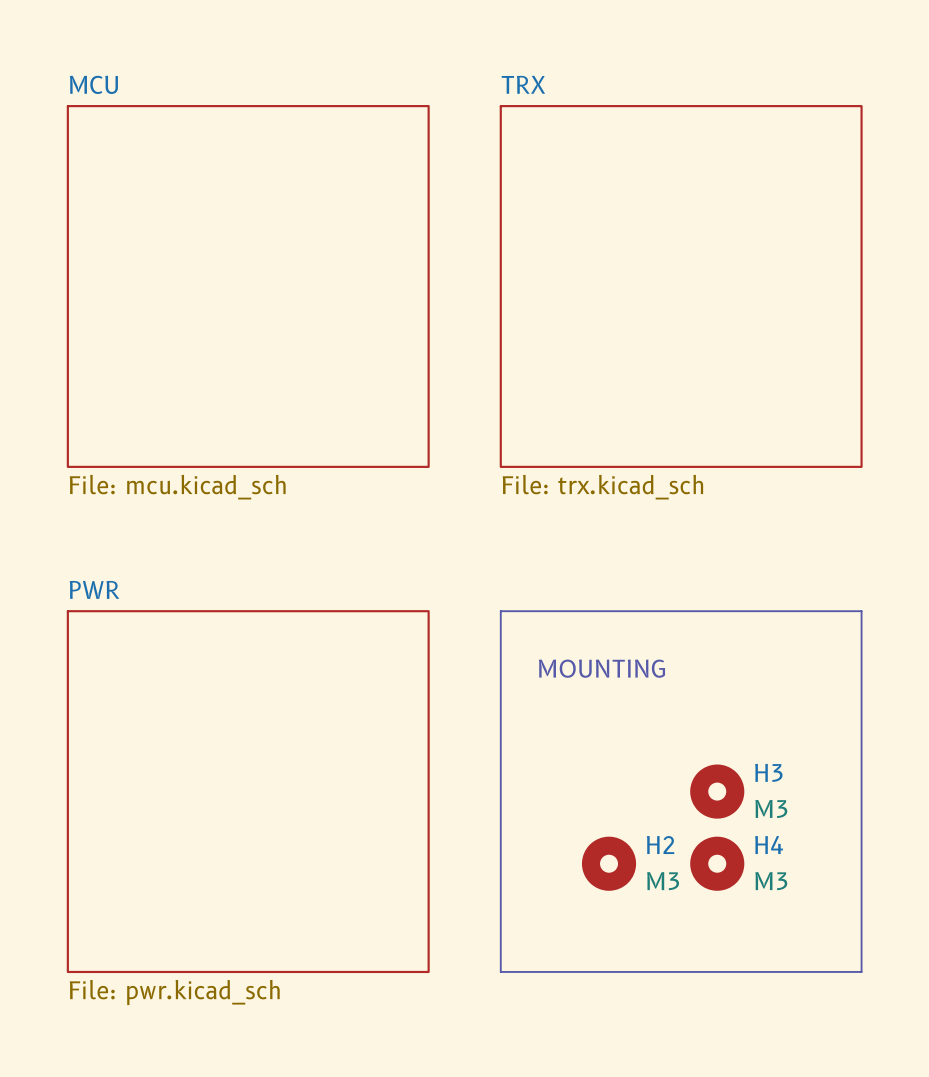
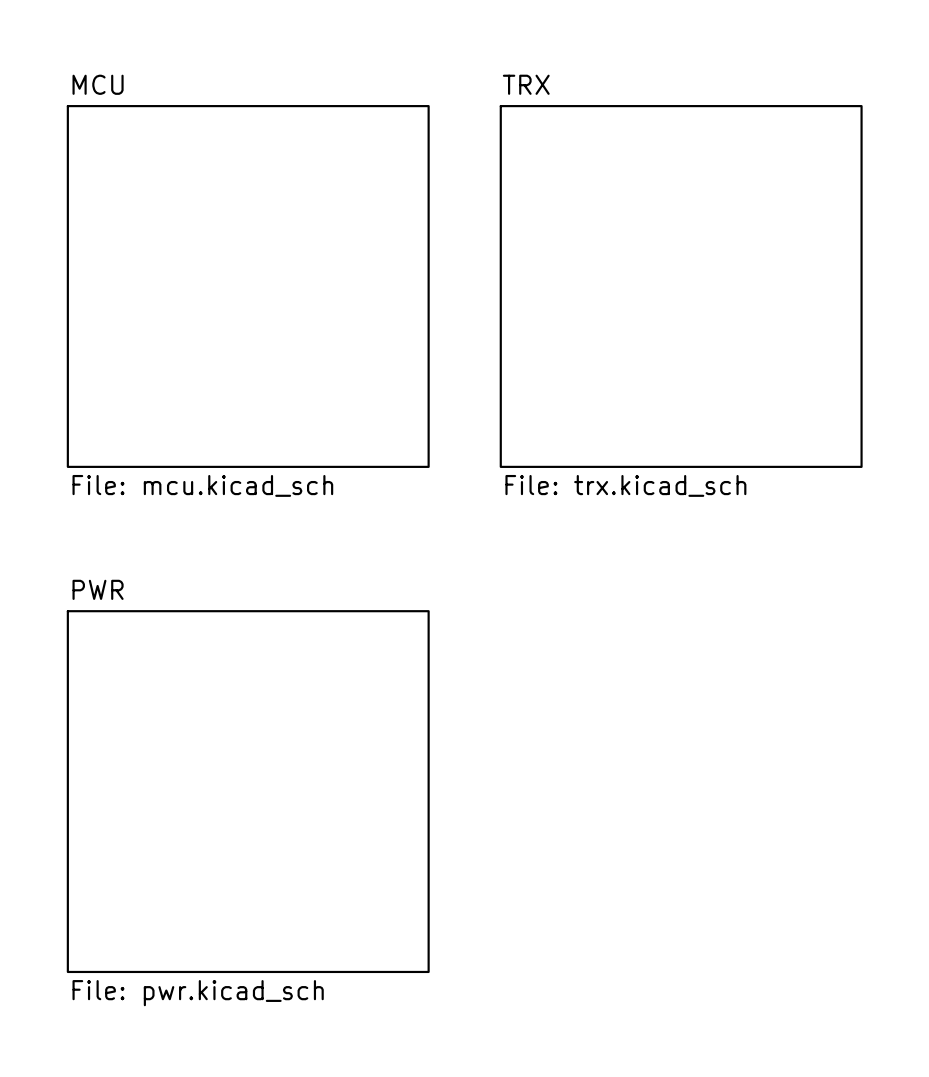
line: (500, 611) (500, 971) (861, 971) (861, 611) (500, 611) -> none
text: MOUNTING (601, 668) -> none
H3: M3 (717, 791) -> none
H2: M3 (609, 863) -> none
H4: M3 (717, 863) -> none

